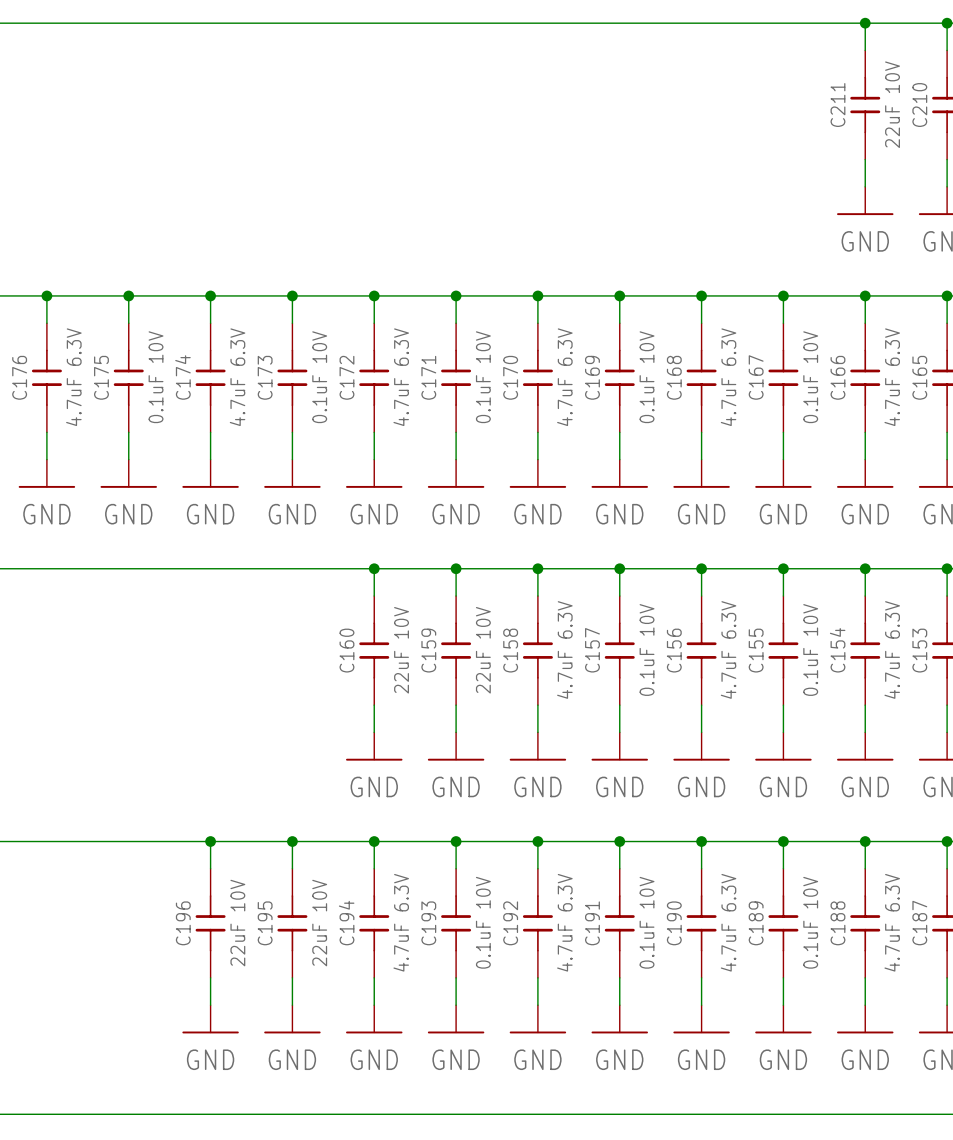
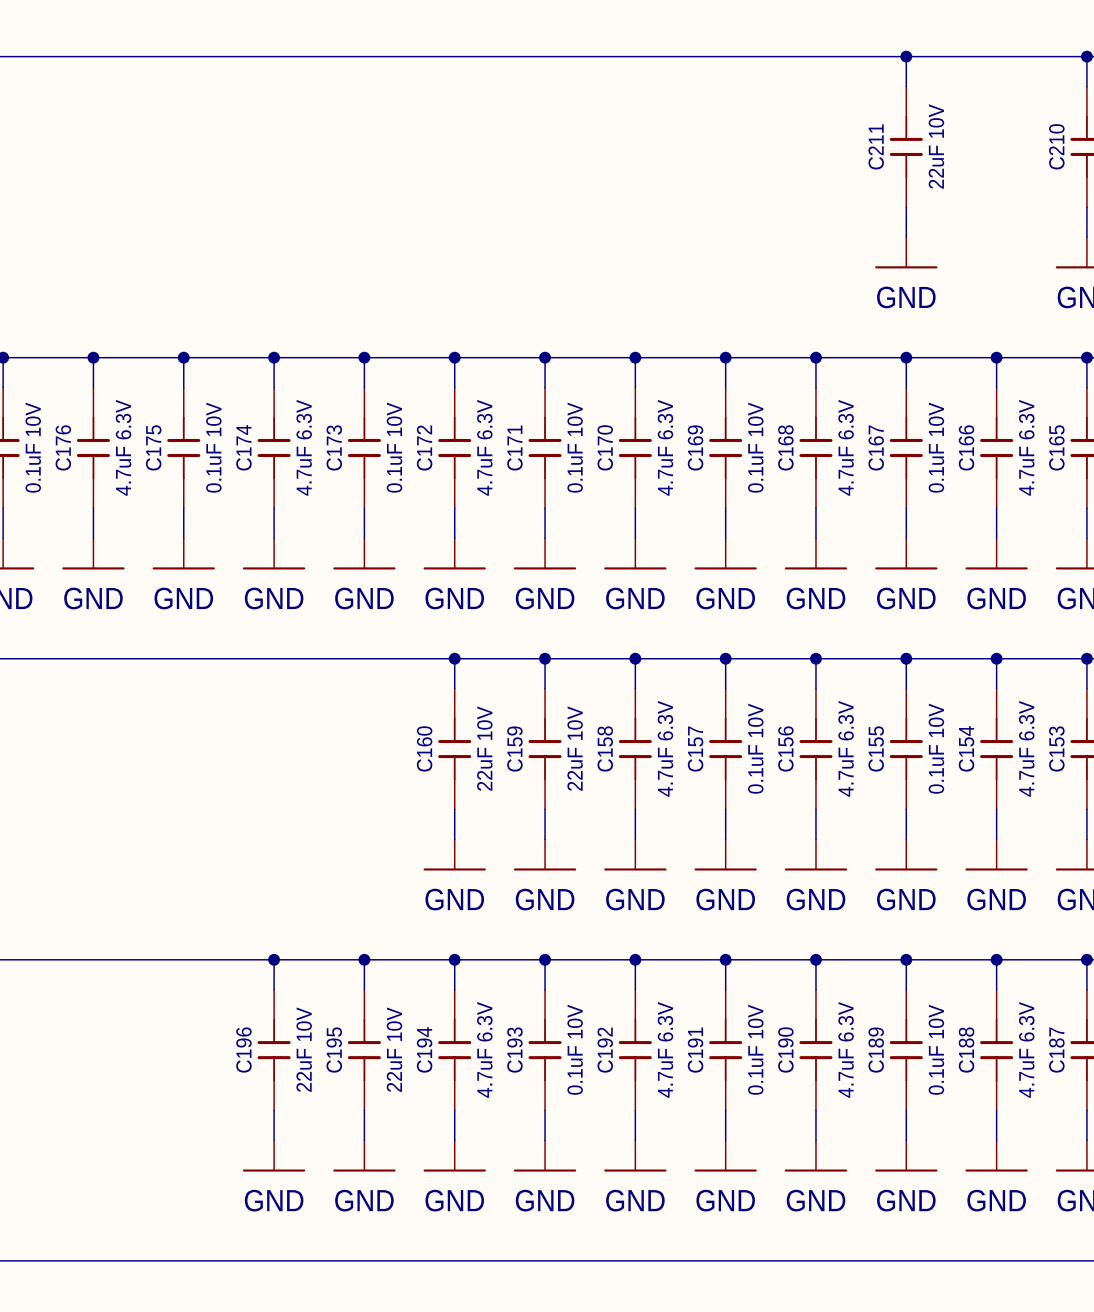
junction: none -> (906, 56)
wire: (865, 23) (865, 50) -> (906, 56) (906, 86)
junction: (865, 23) -> none
C211 position: (865, 105) -> (906, 146)
wire: (865, 159) (865, 186) -> (906, 207) (906, 237)
power symbol position: GND (865, 200) -> GND (906, 252)

